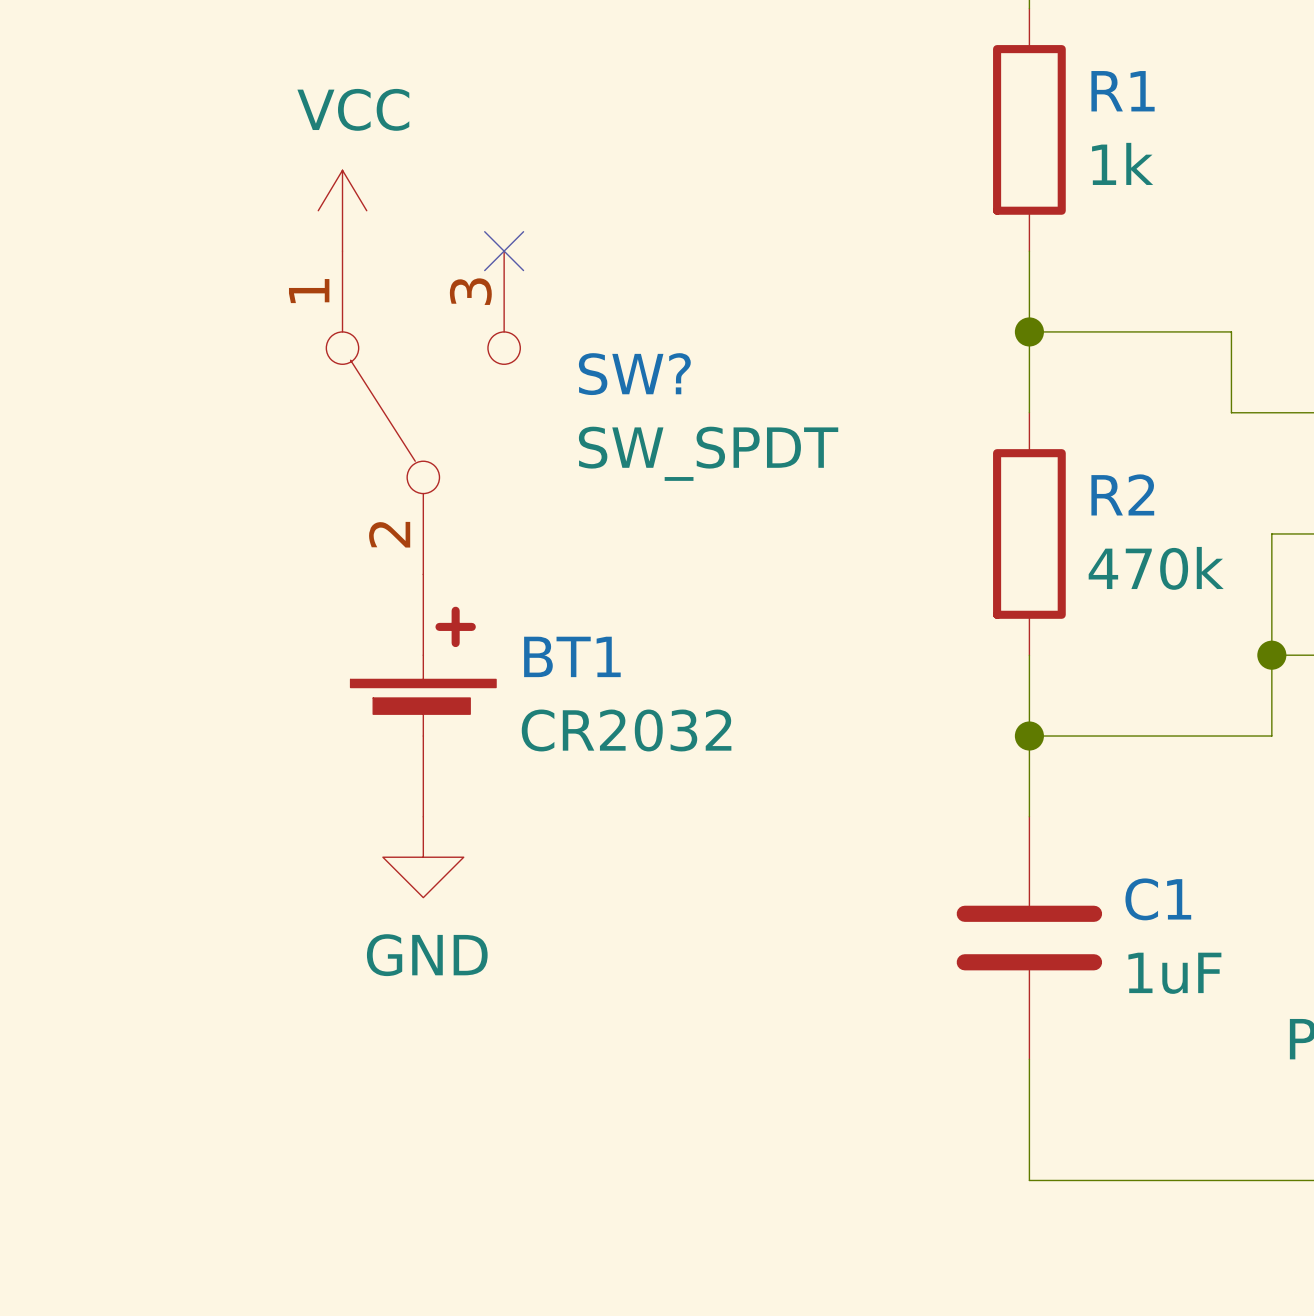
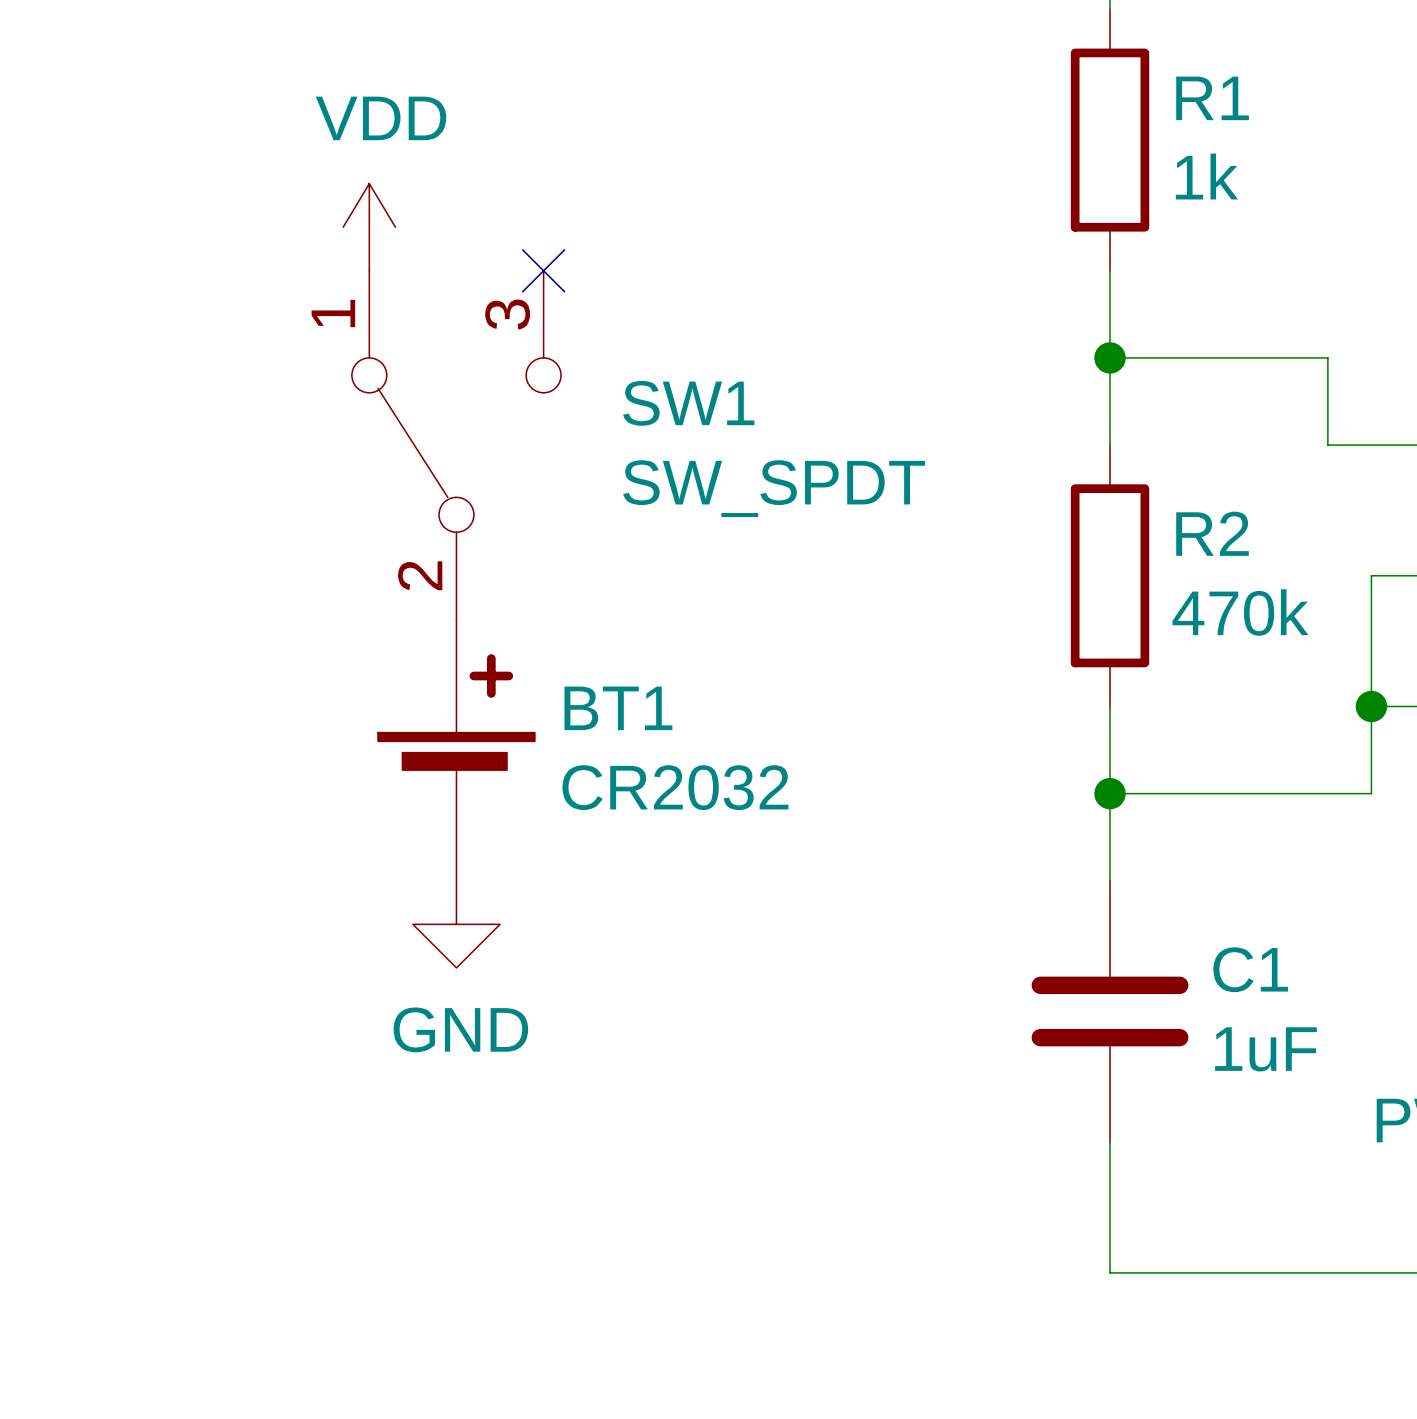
power symbol: VCC (342, 210) -> VDD (369, 227)
SW? name: SW? (634, 374) -> SW1 (688, 403)

